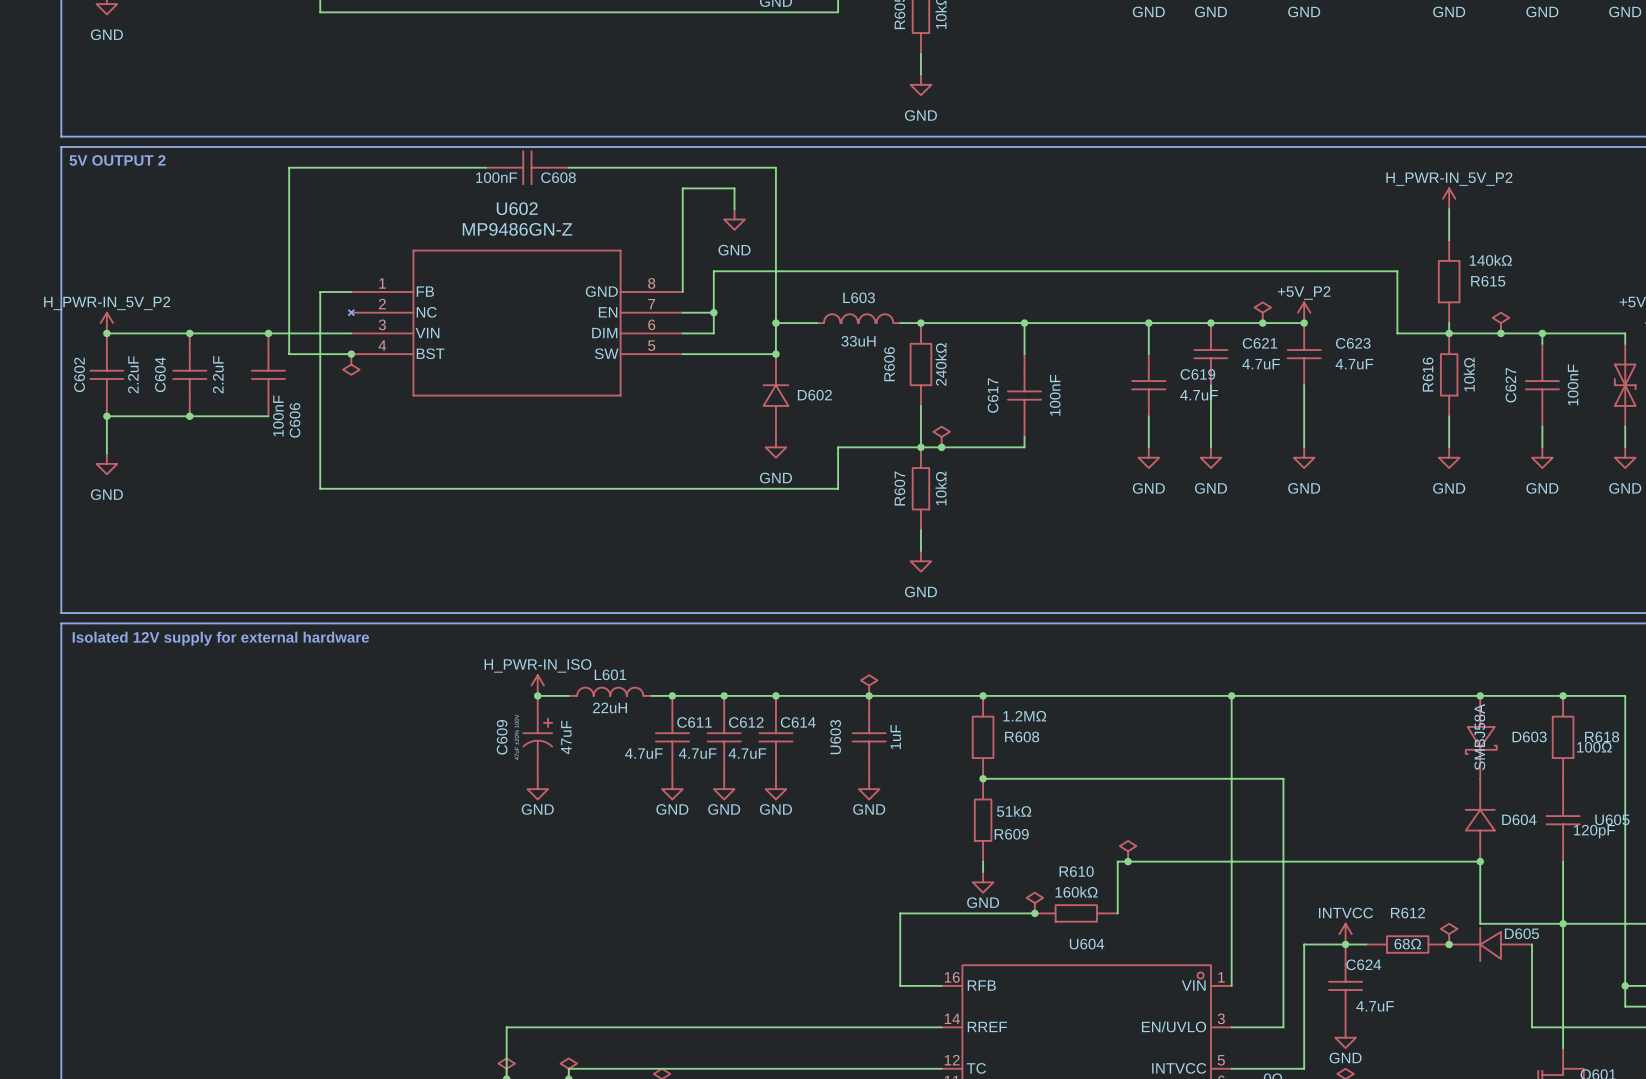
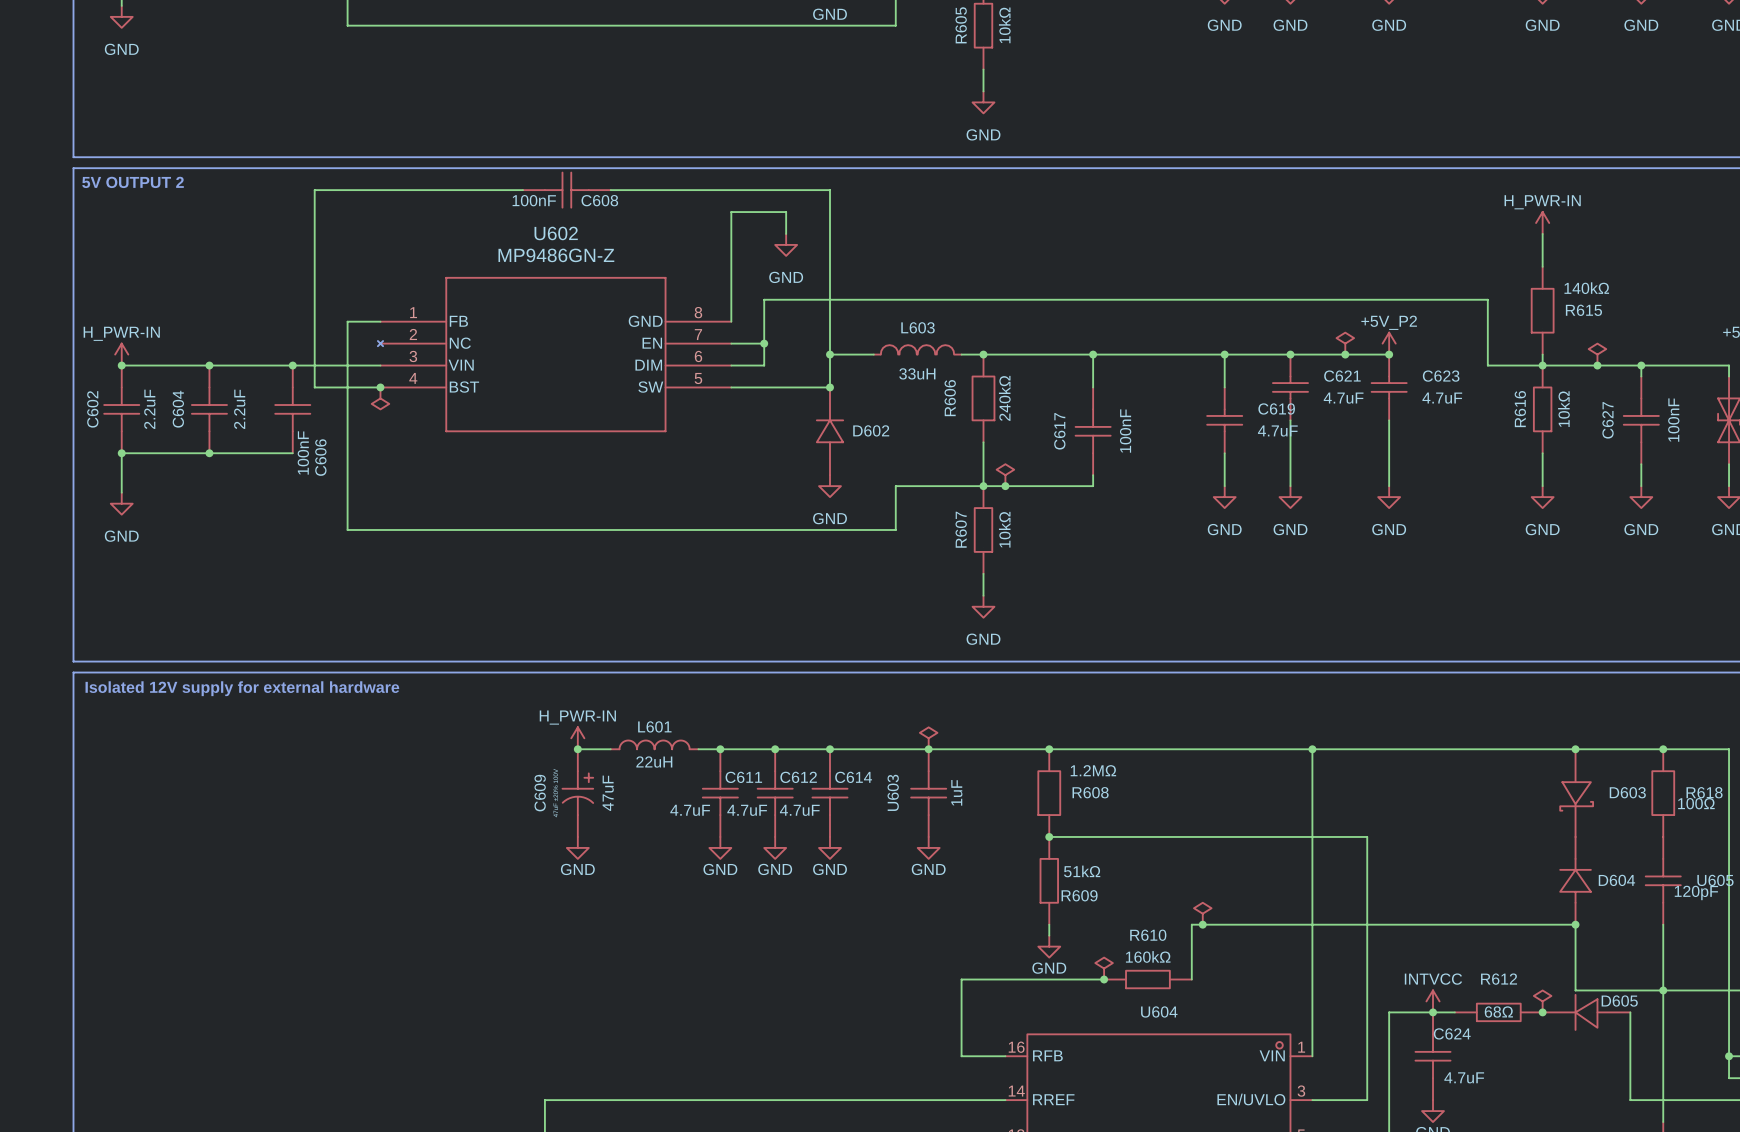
power symbol: H_PWR-IN_5V_P2 (1449, 198) -> H_PWR-IN (1542, 223)
power symbol: H_PWR-IN_5V_P2 (106, 323) -> H_PWR-IN (121, 354)
power symbol: H_PWR-IN_ISO (537, 685) -> H_PWR-IN (577, 738)
D603 value: SMBJ58A (1479, 737) -> none

